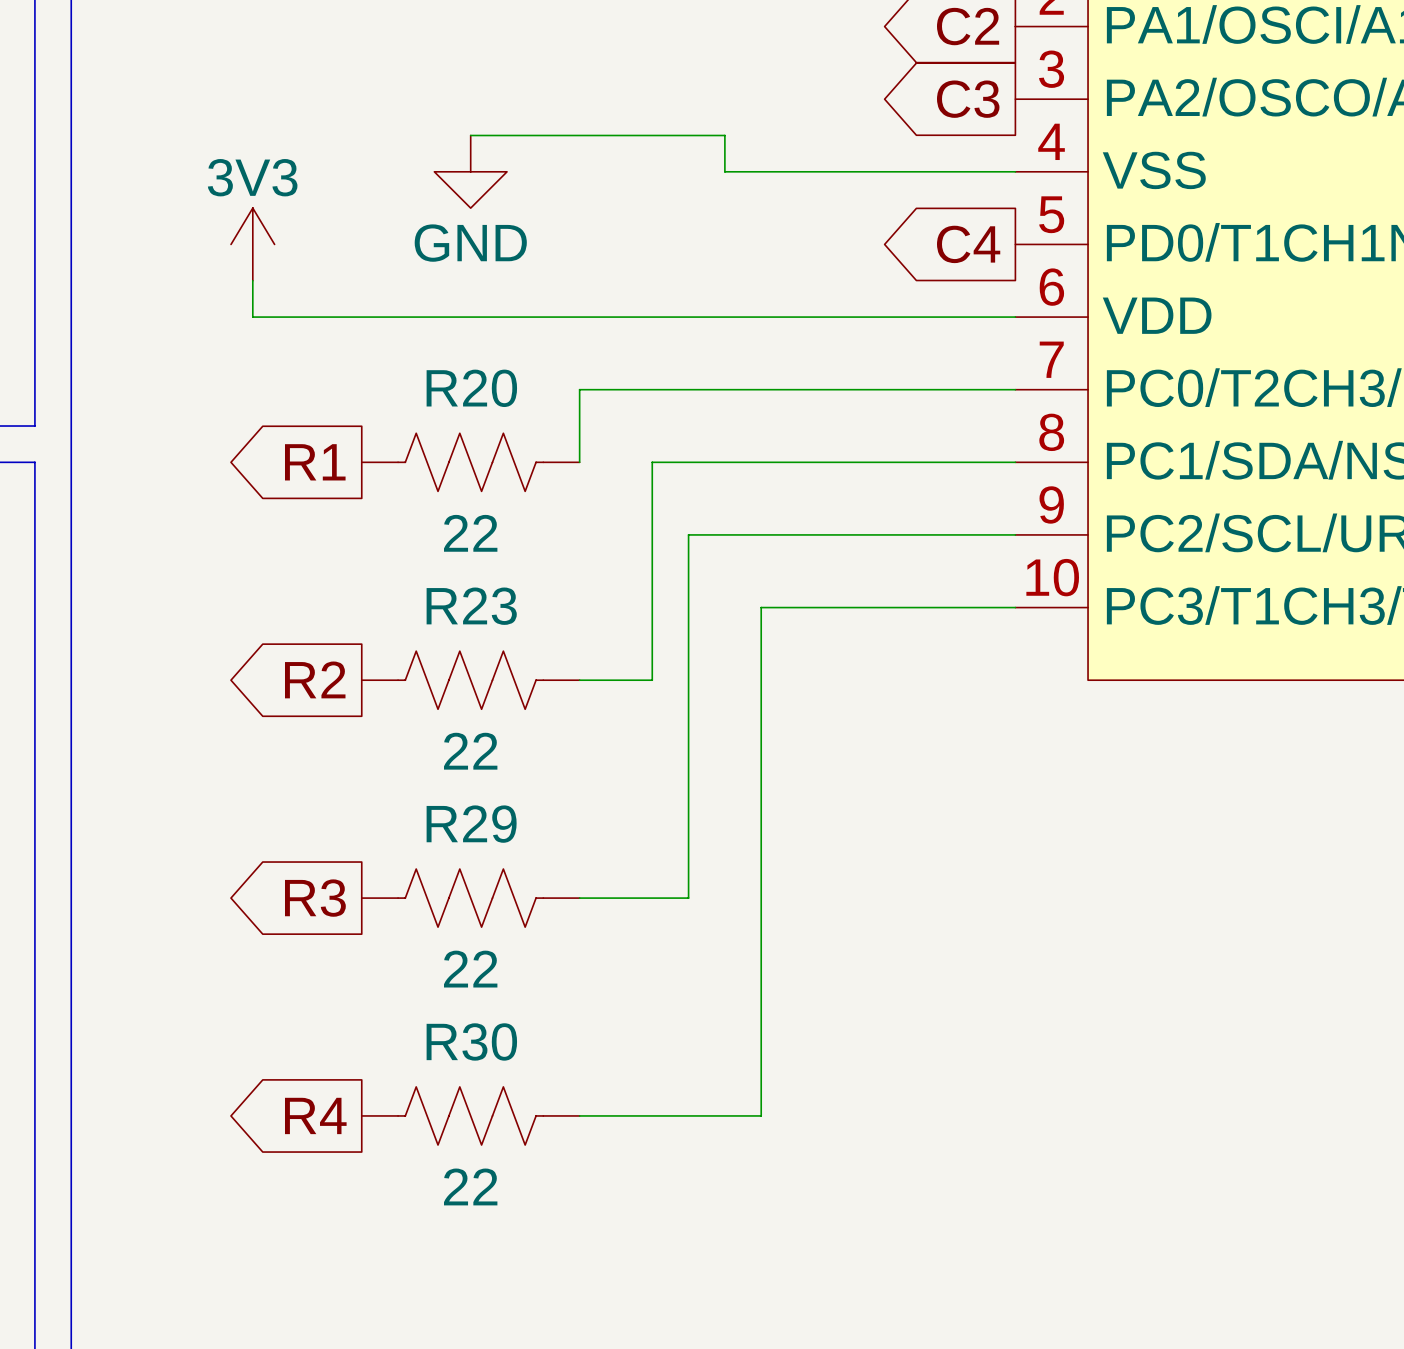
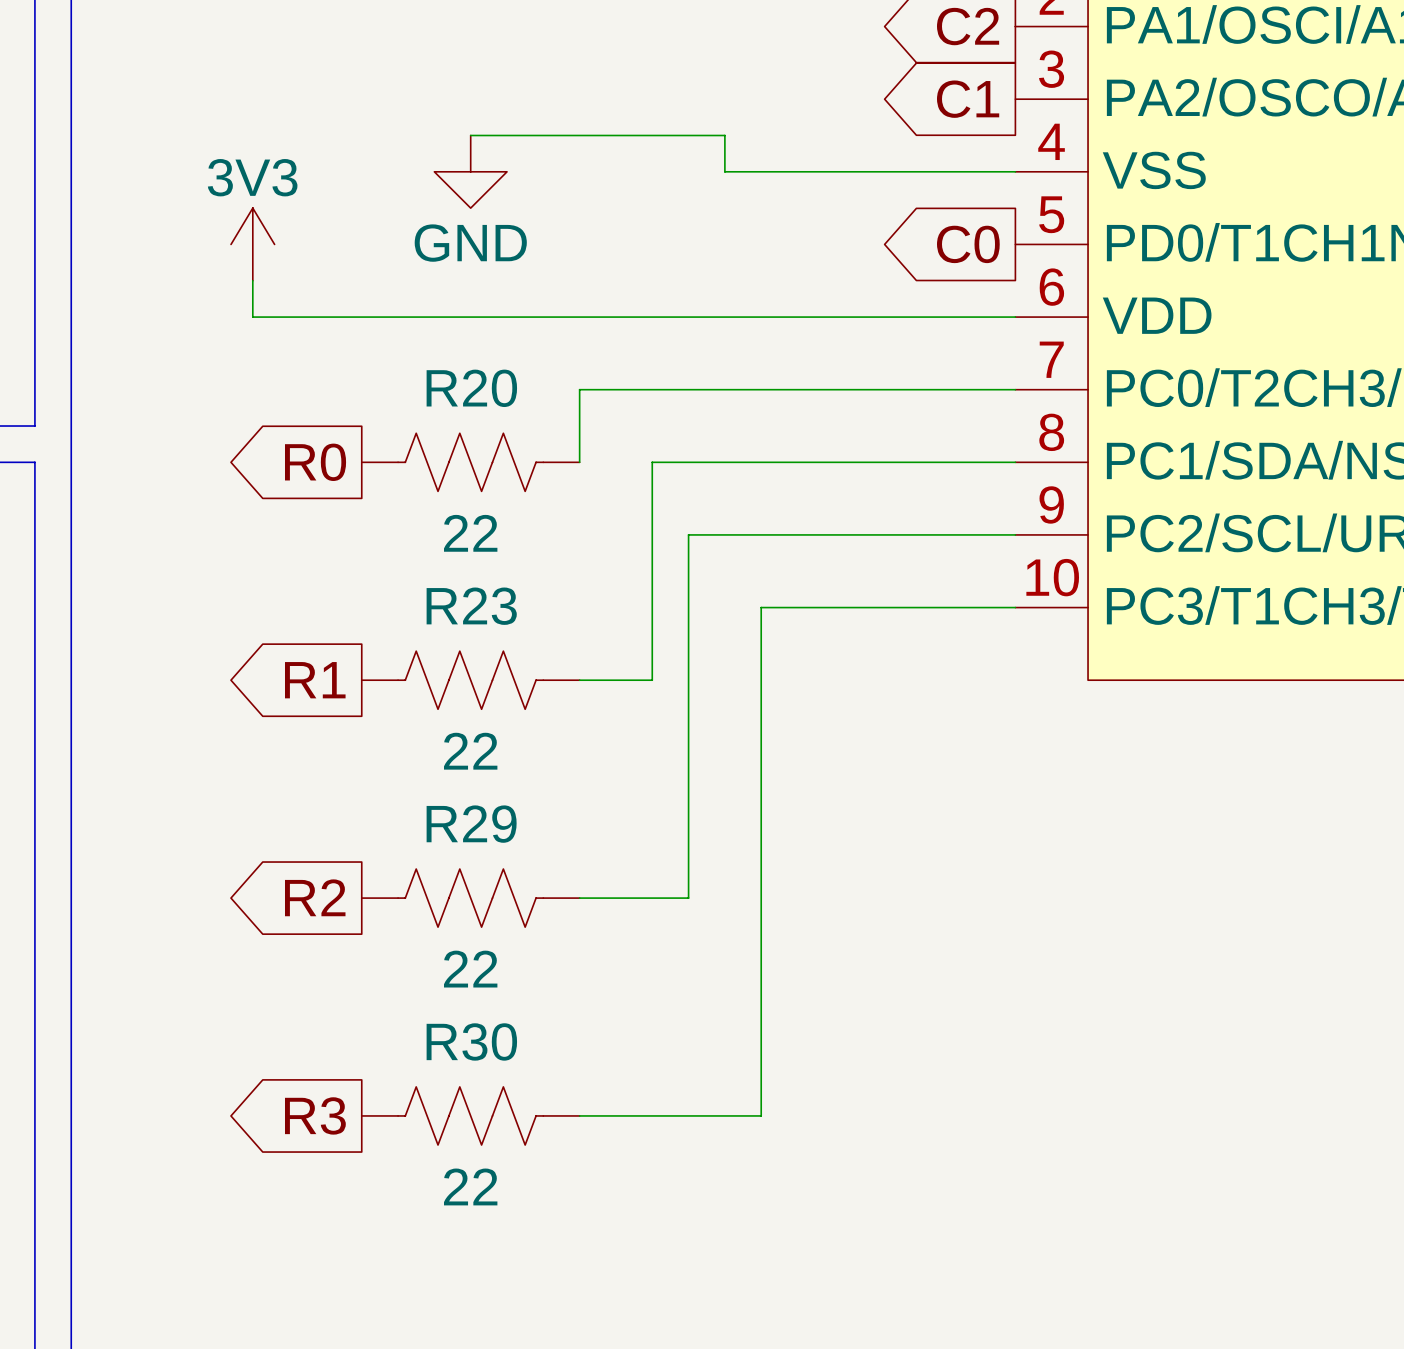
global label: C3 (968, 99) -> C1 (968, 99)
global label: C4 (968, 244) -> C0 (968, 244)
global label: R1 (315, 462) -> R0 (315, 462)
global label: R2 (315, 679) -> R1 (315, 680)
global label: R3 (315, 898) -> R2 (315, 897)
global label: R4 (315, 1115) -> R3 (315, 1115)

